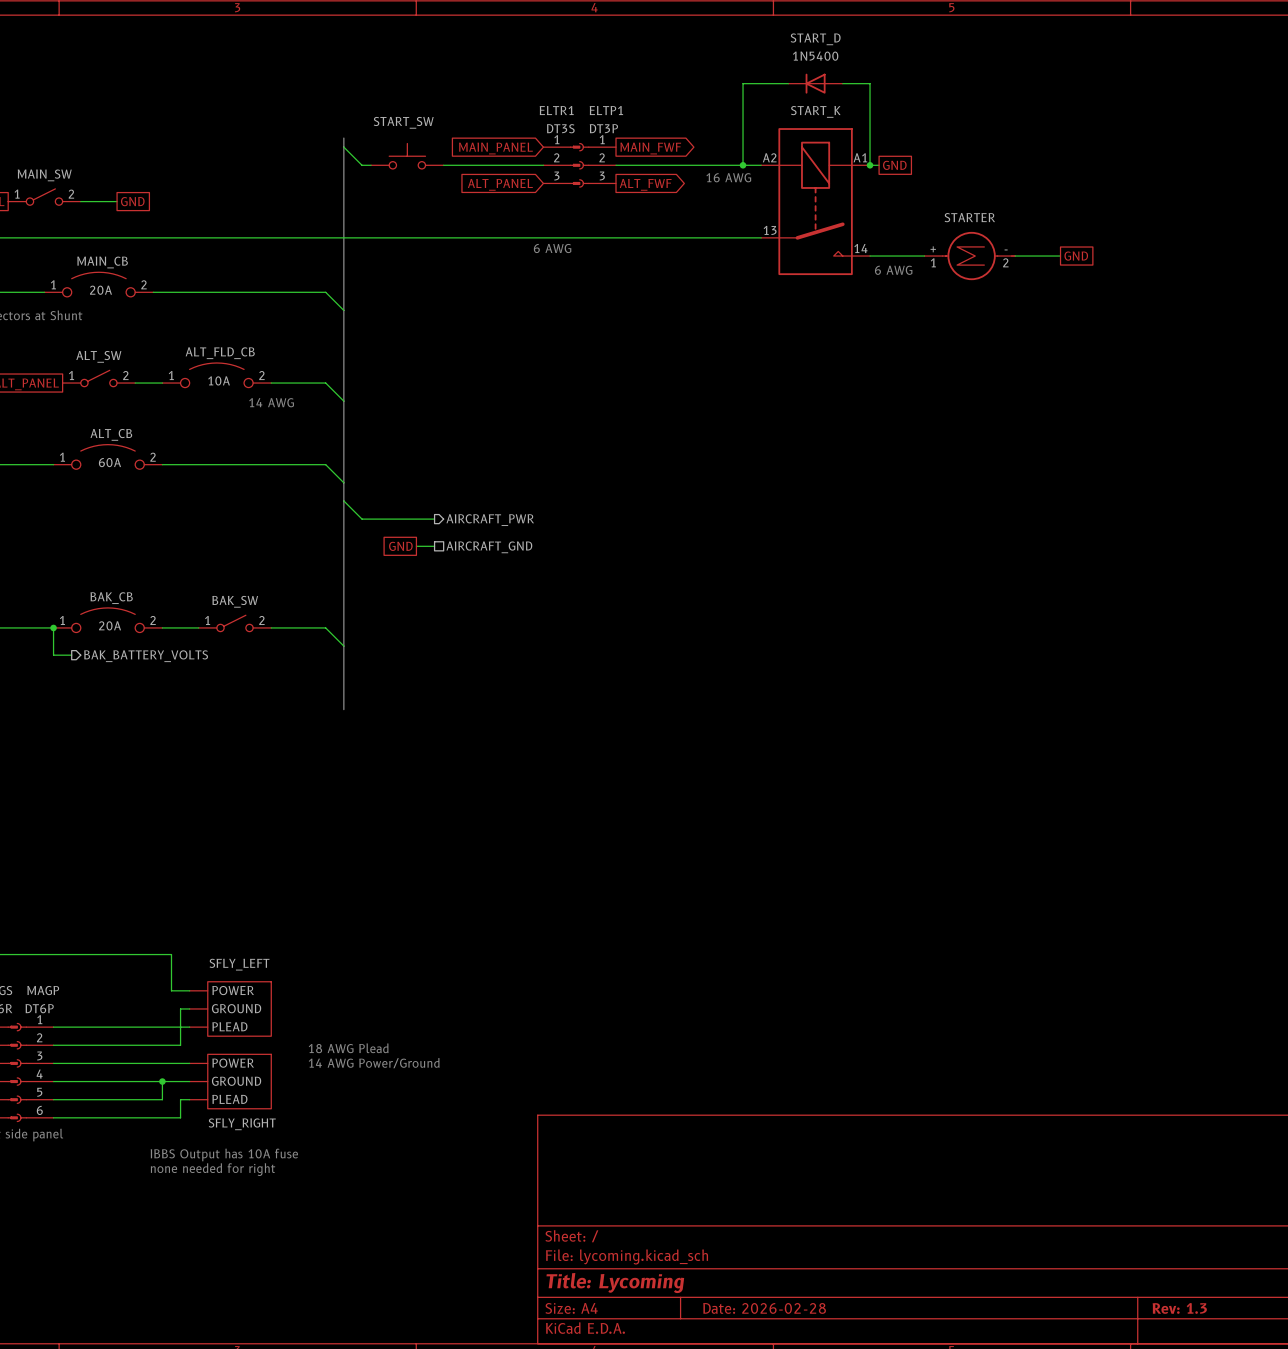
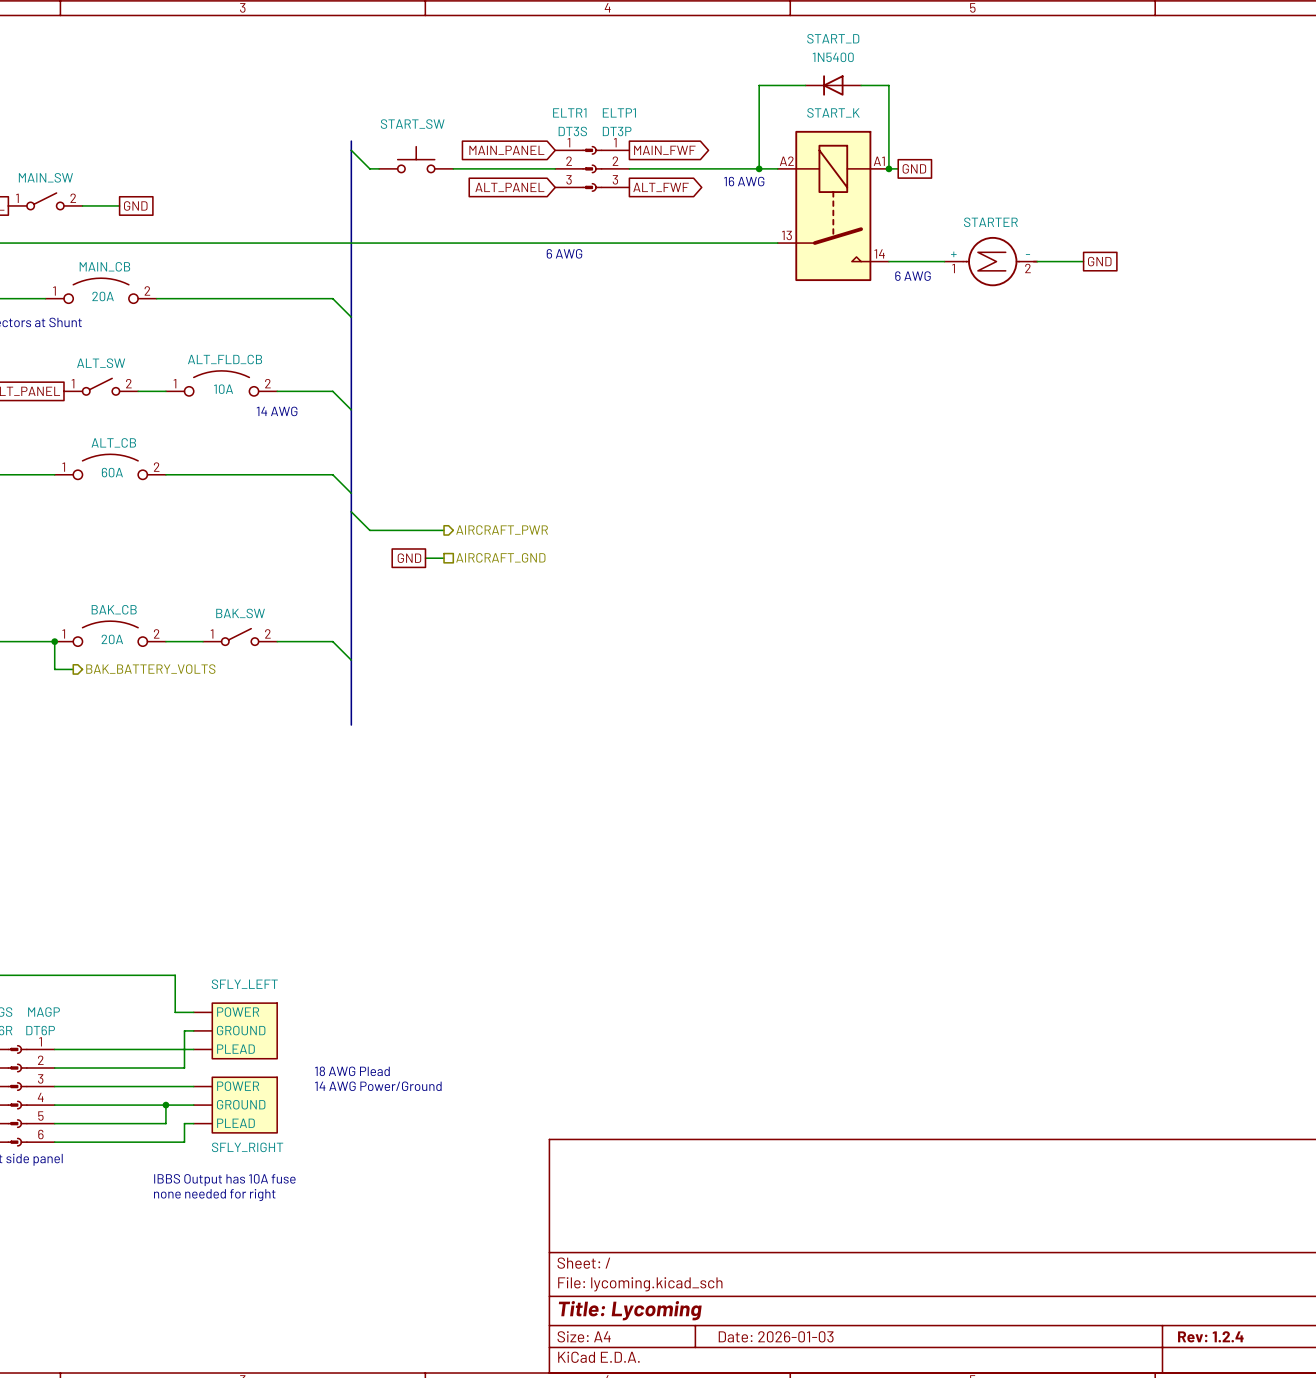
title block: Date: 2026-02-28 (764, 1308) -> Date: 2026-01-03 (776, 1336)
title block: Rev: 1.3 (1179, 1308) -> Rev: 1.2.4 (1210, 1336)

